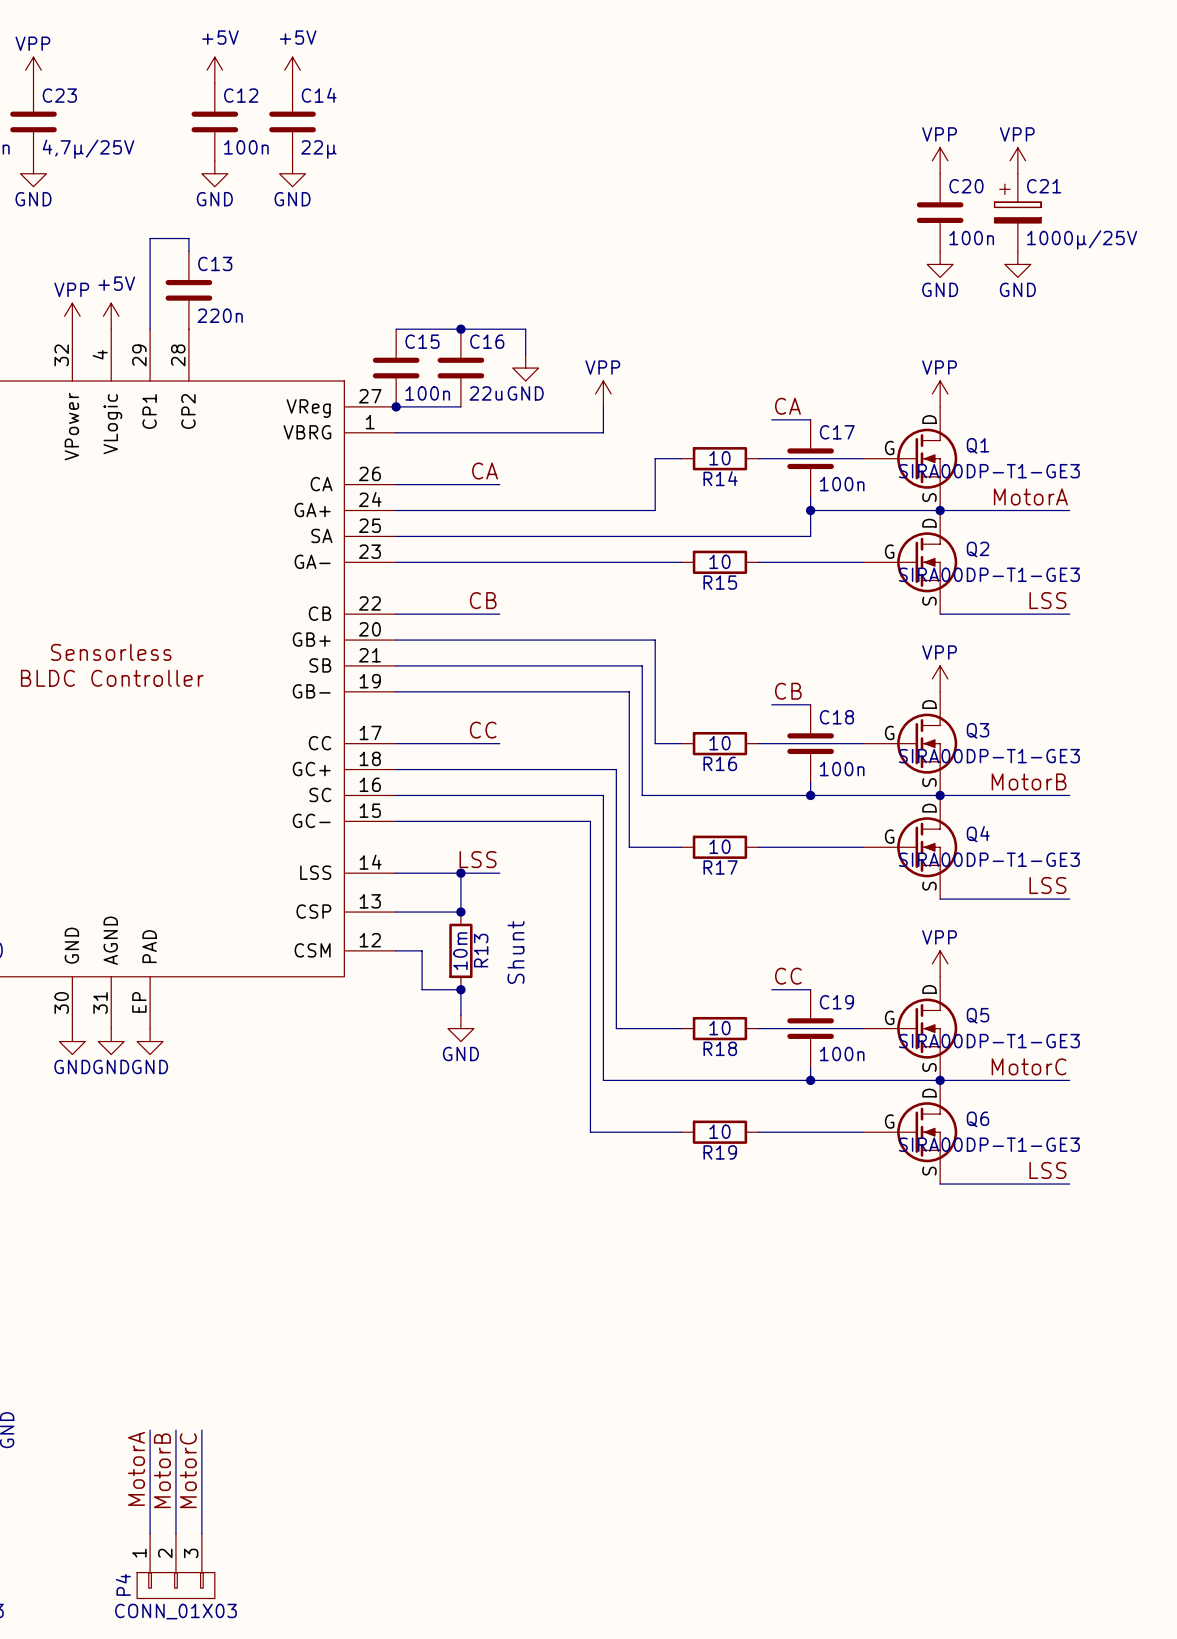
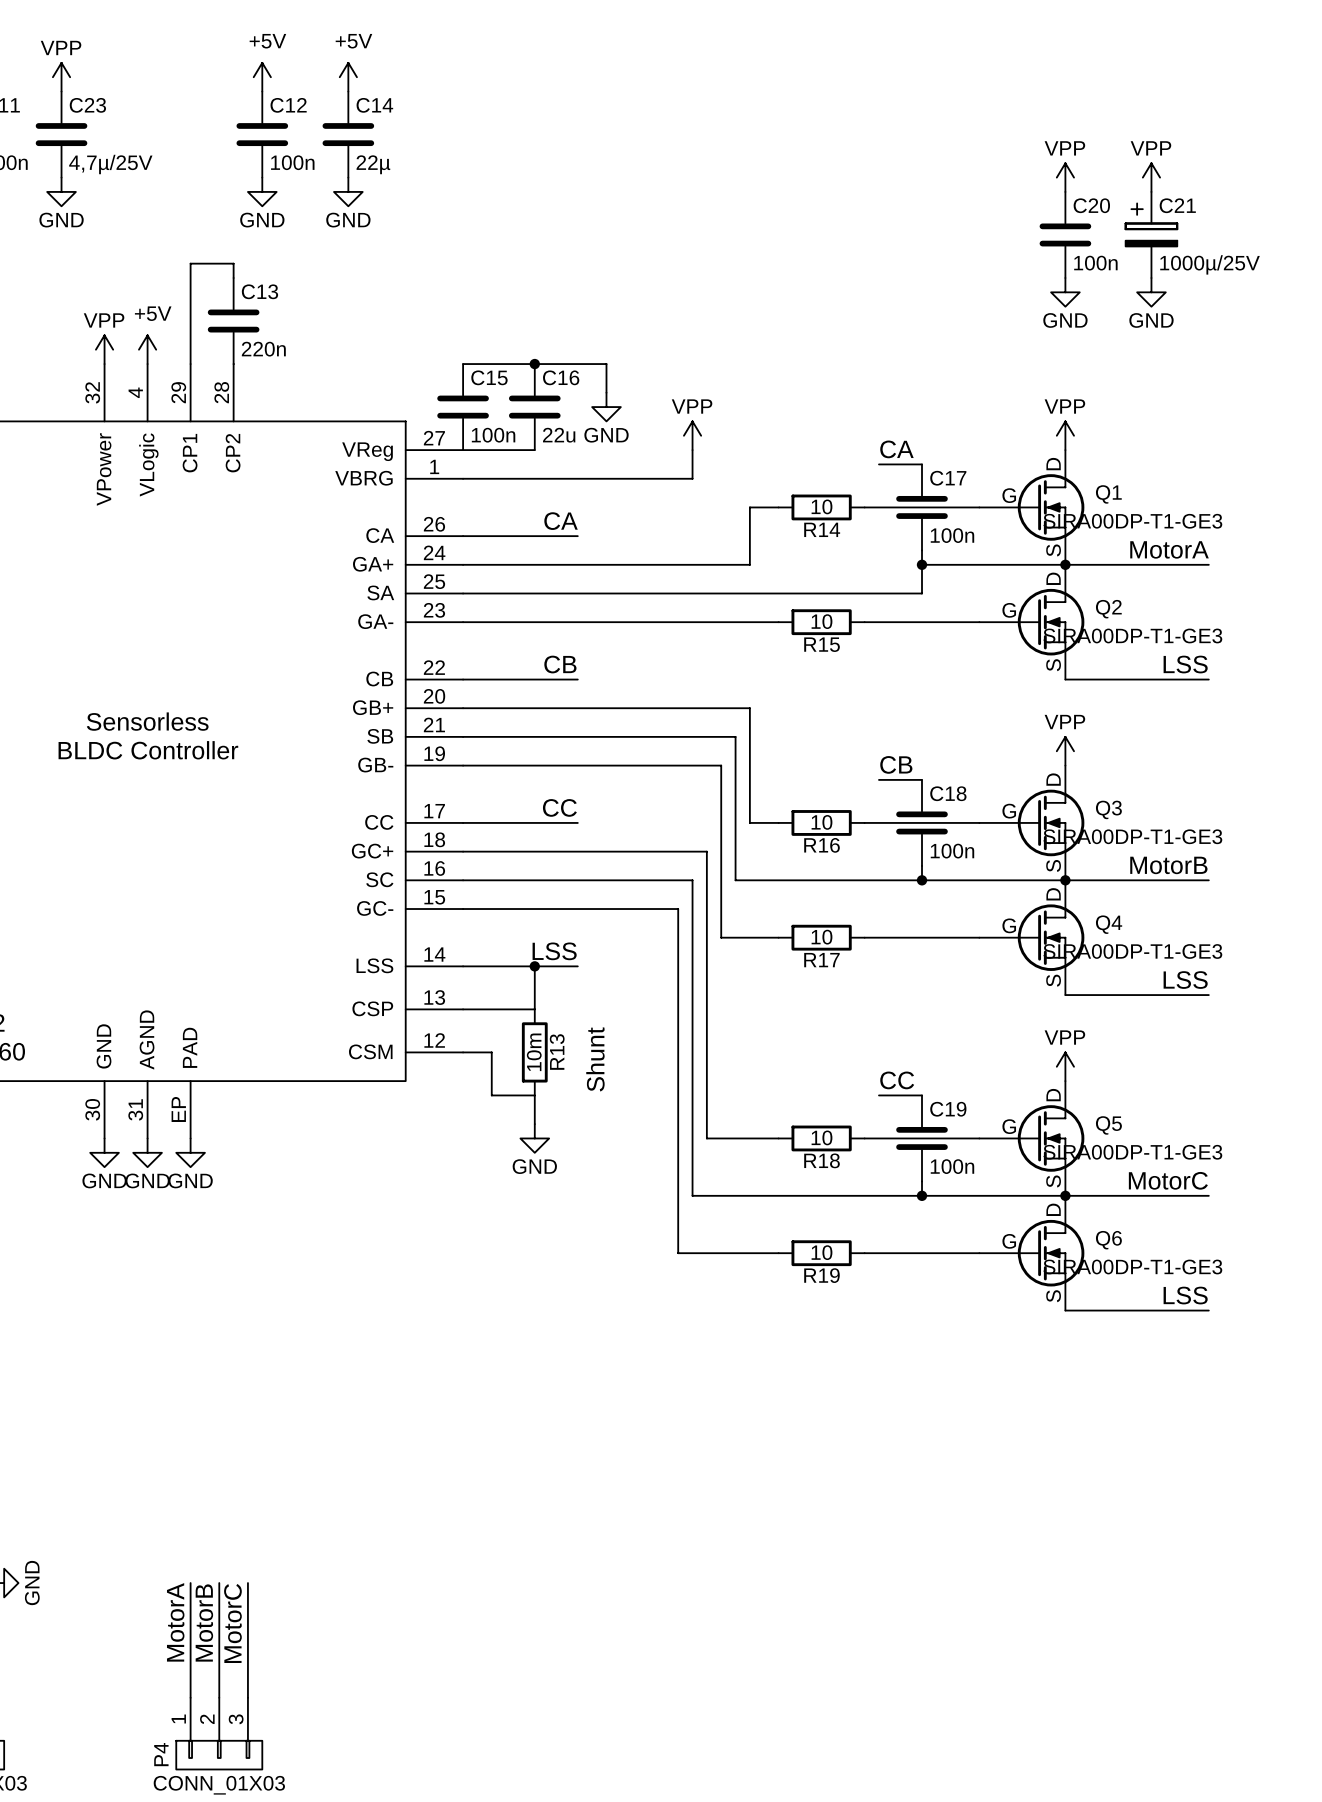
junction: (396, 406) -> none
junction: (460, 912) -> none
junction: (460, 989) -> none

